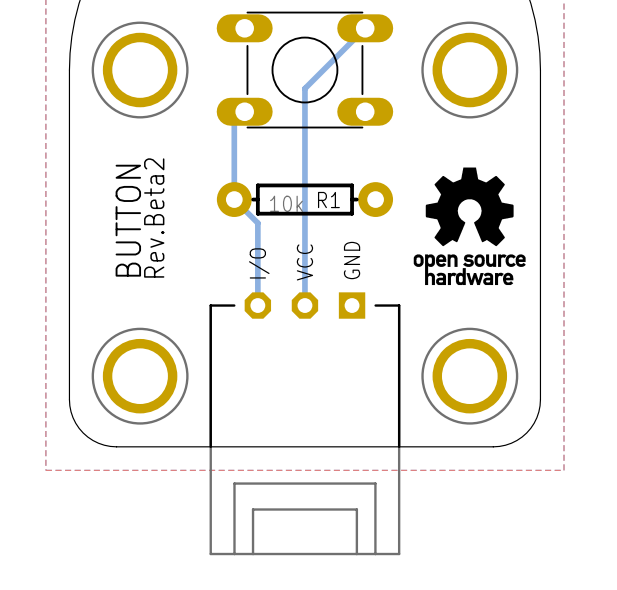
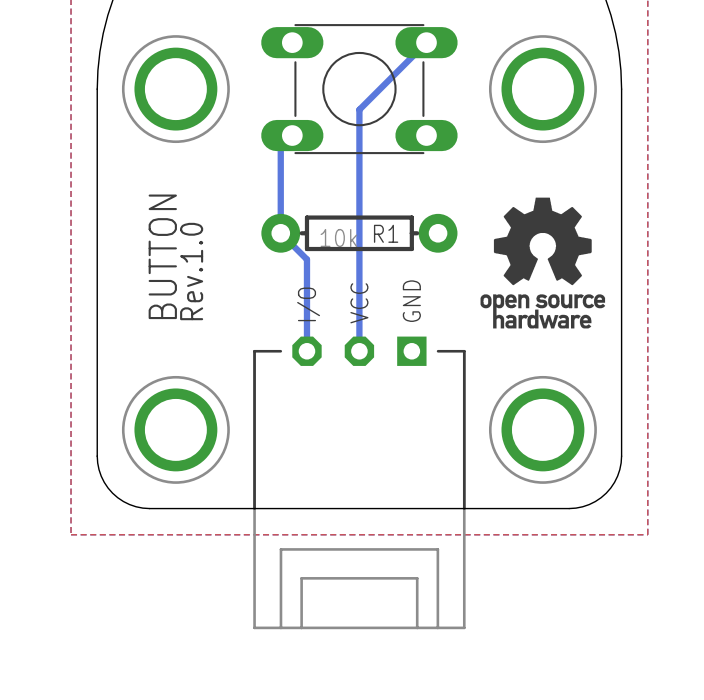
text: Rev.Beta2 (154, 218) -> Rev.1.0 (191, 271)

